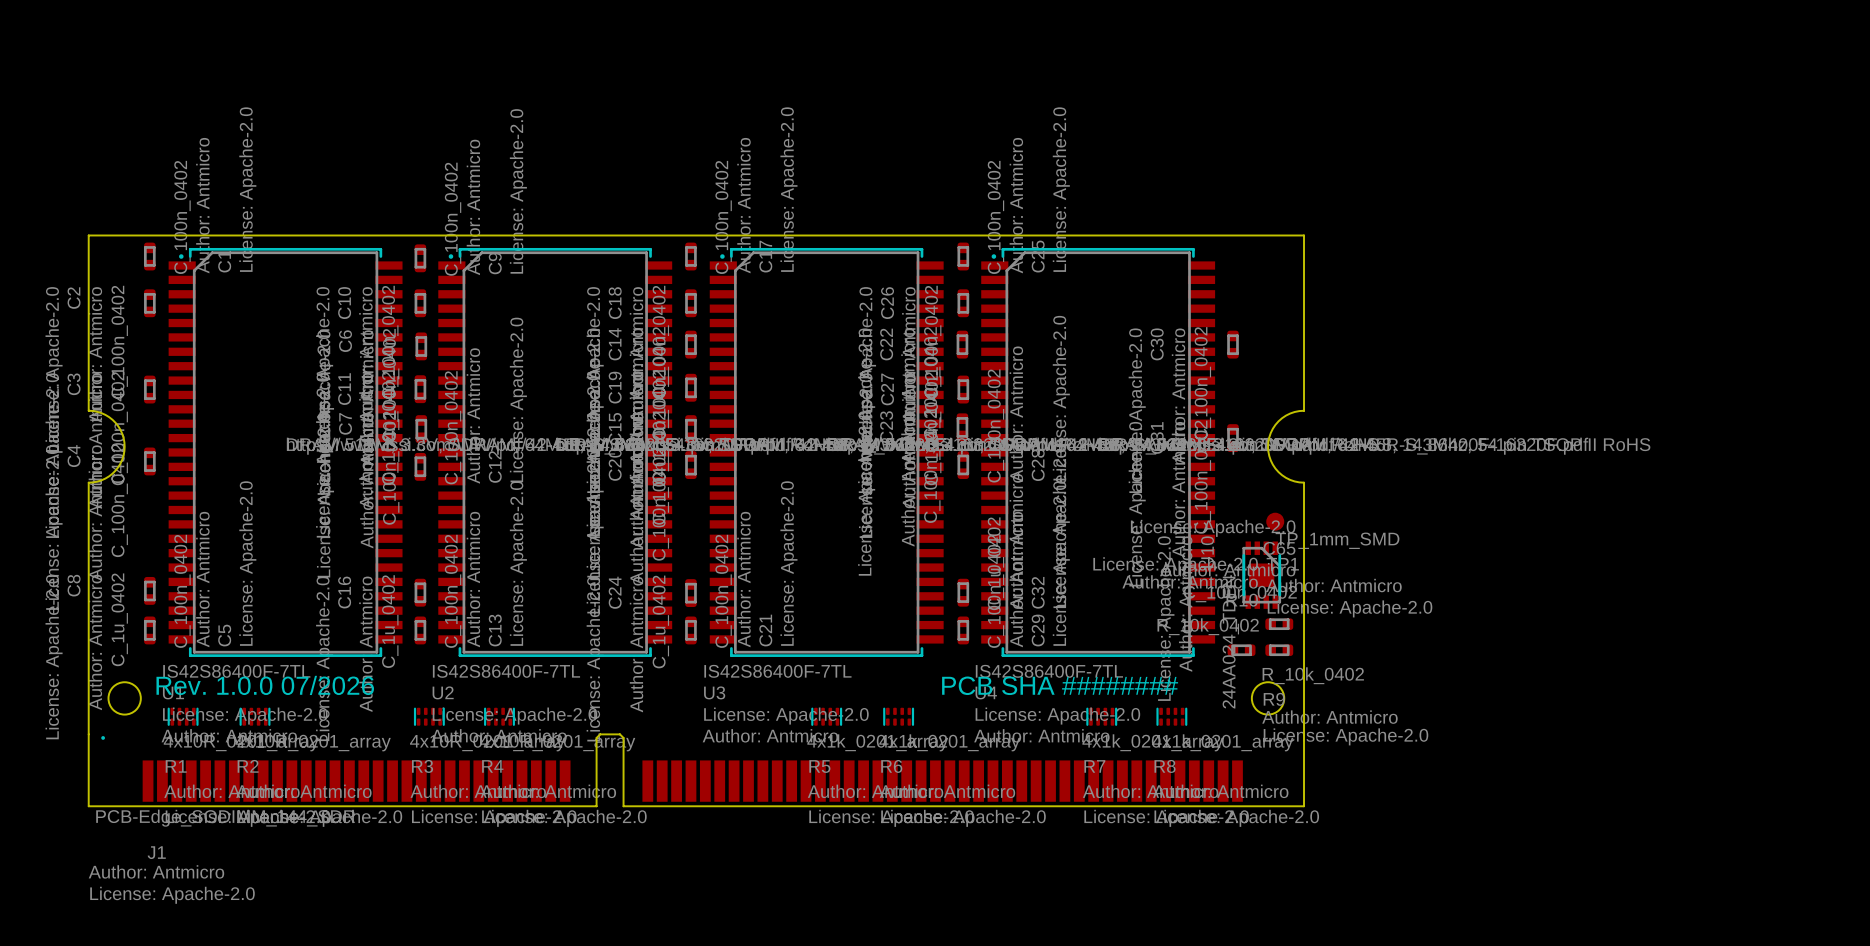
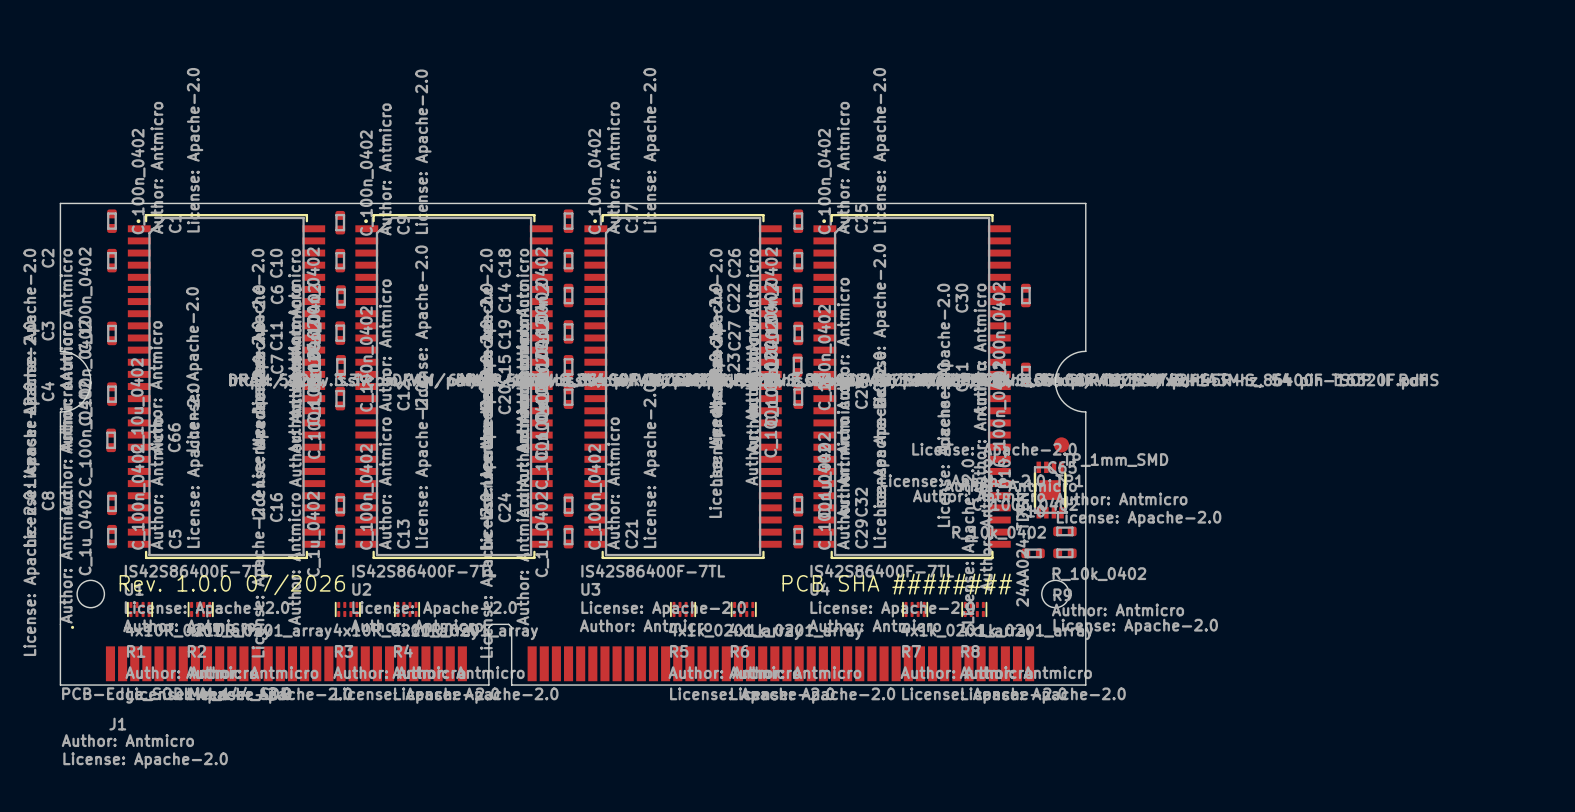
C66: none -> C_10u_0402 (111, 440)

